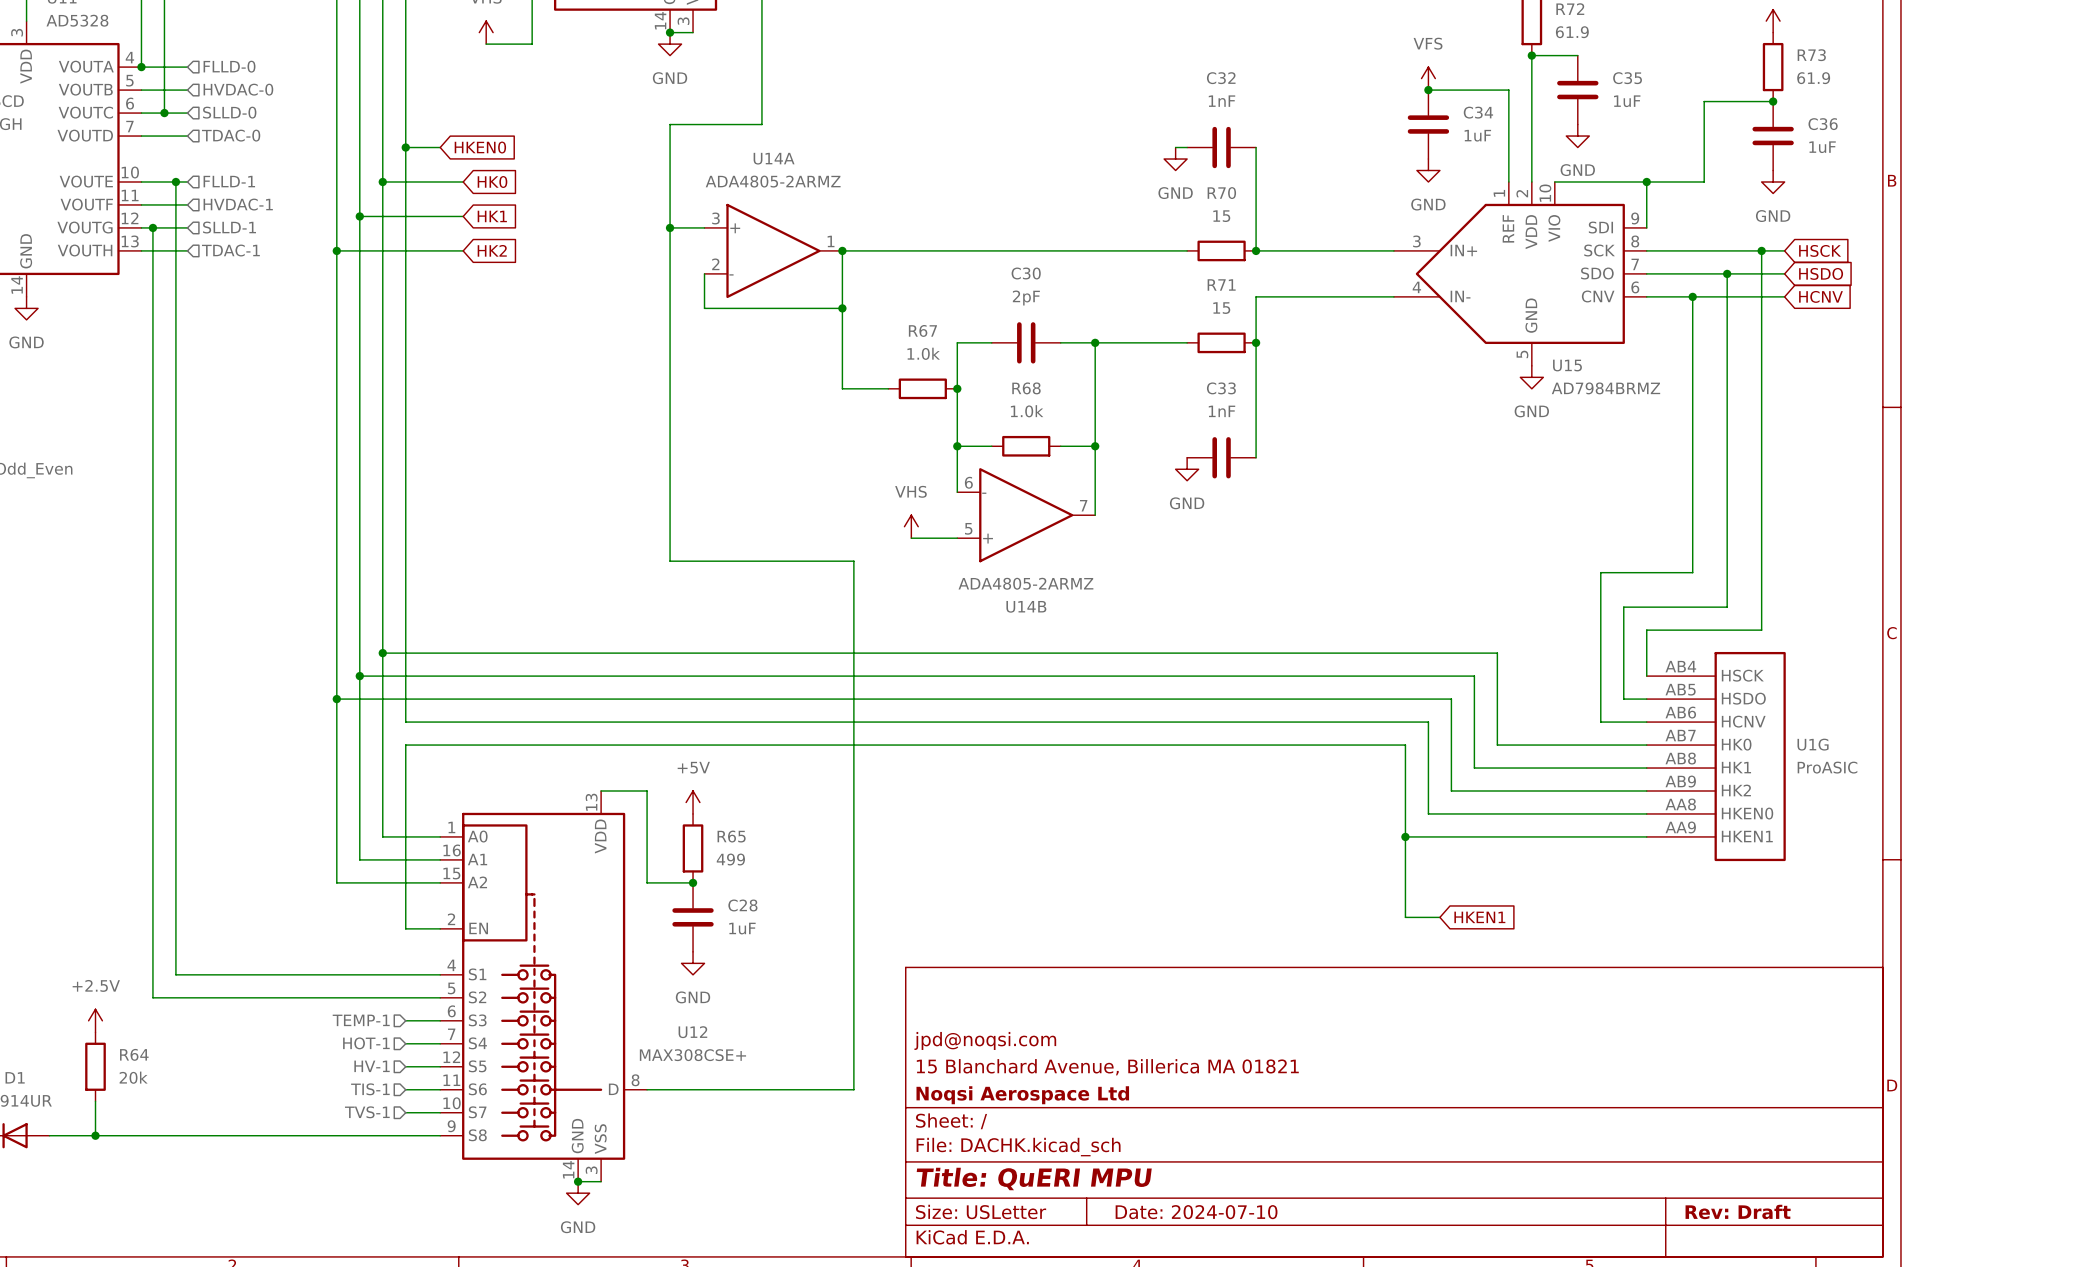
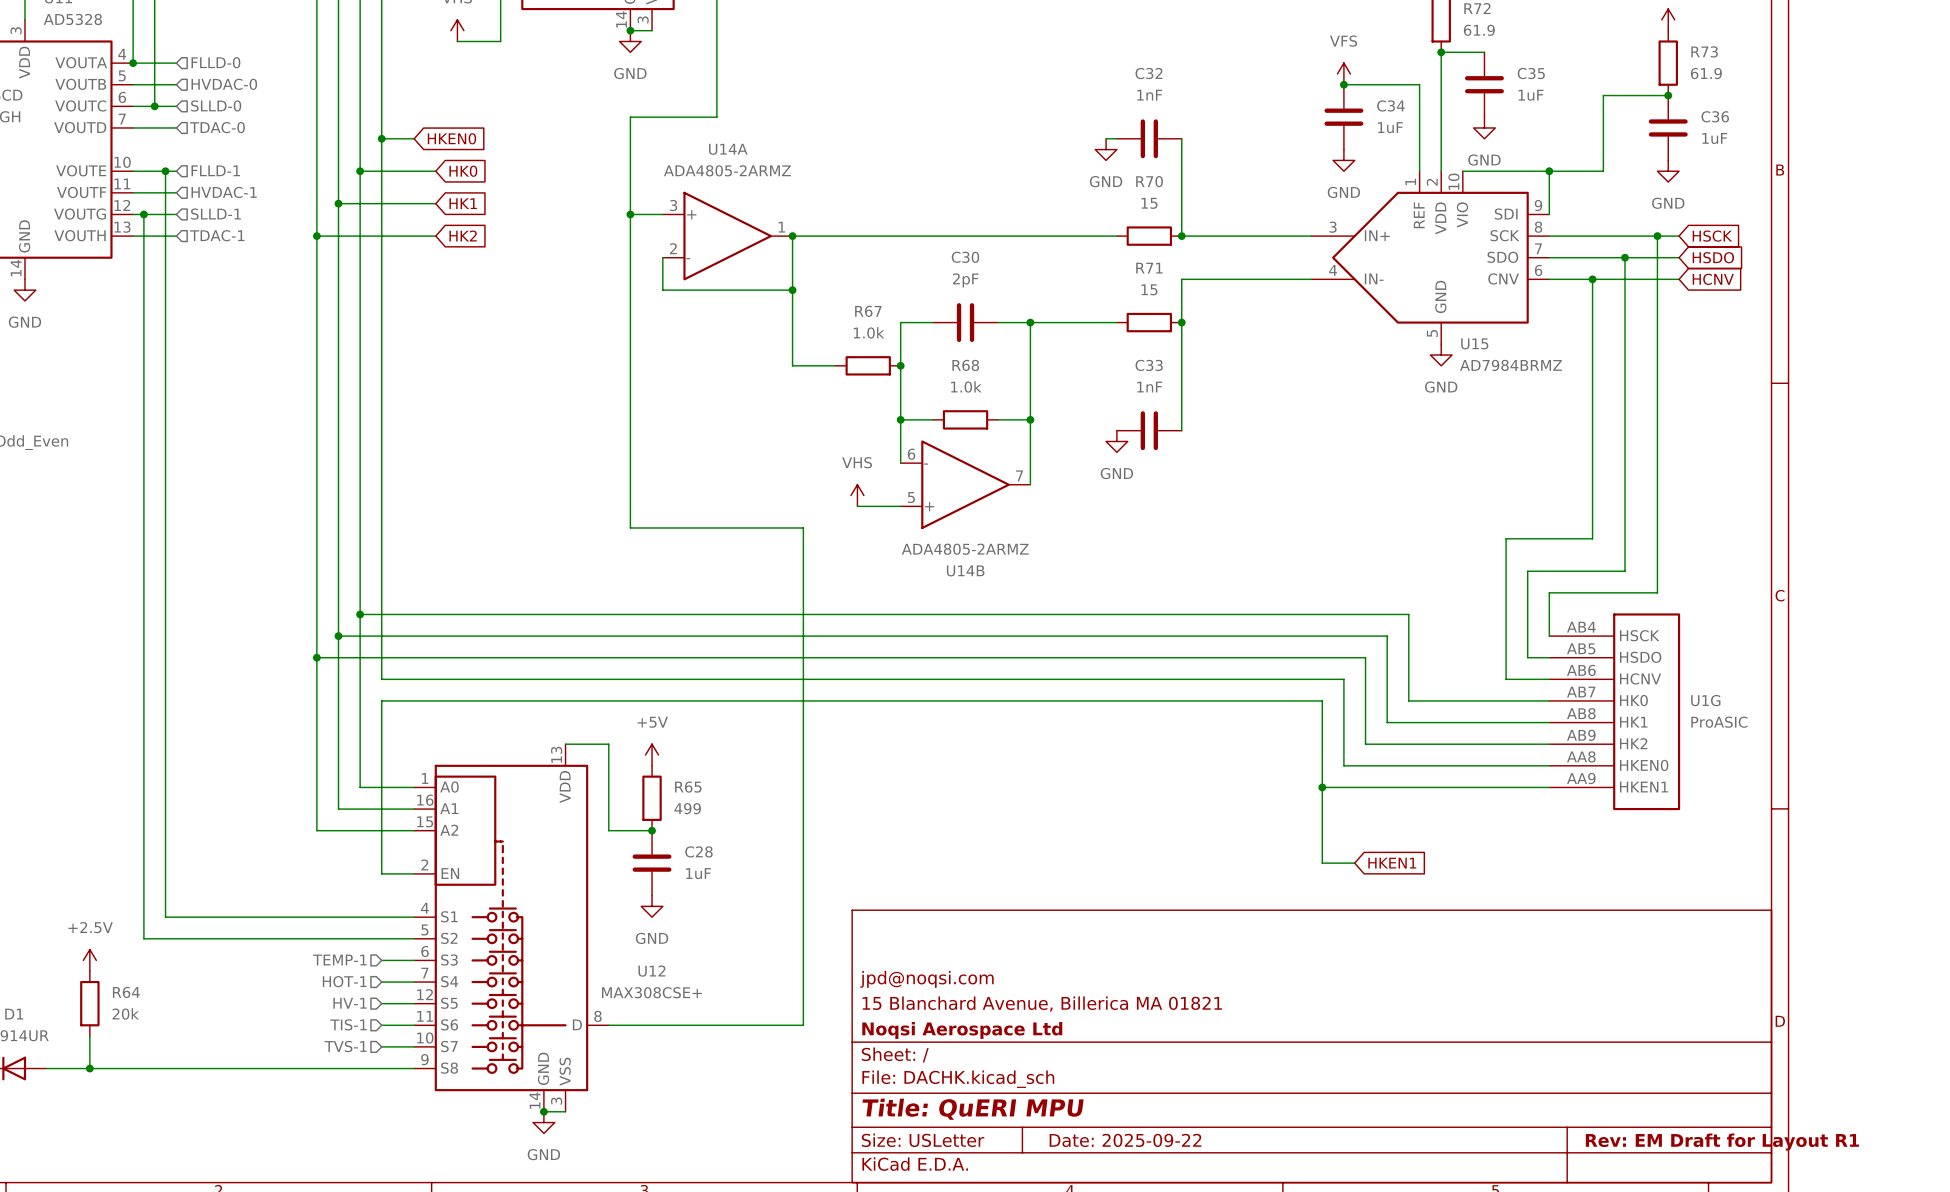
title block: Rev: Draft (1738, 1211) -> Rev: EM Draft for Layout R1 (1722, 1142)
title block: Date: 2024-07-10 (1196, 1212) -> Date: 2025-09-22 (1125, 1140)

